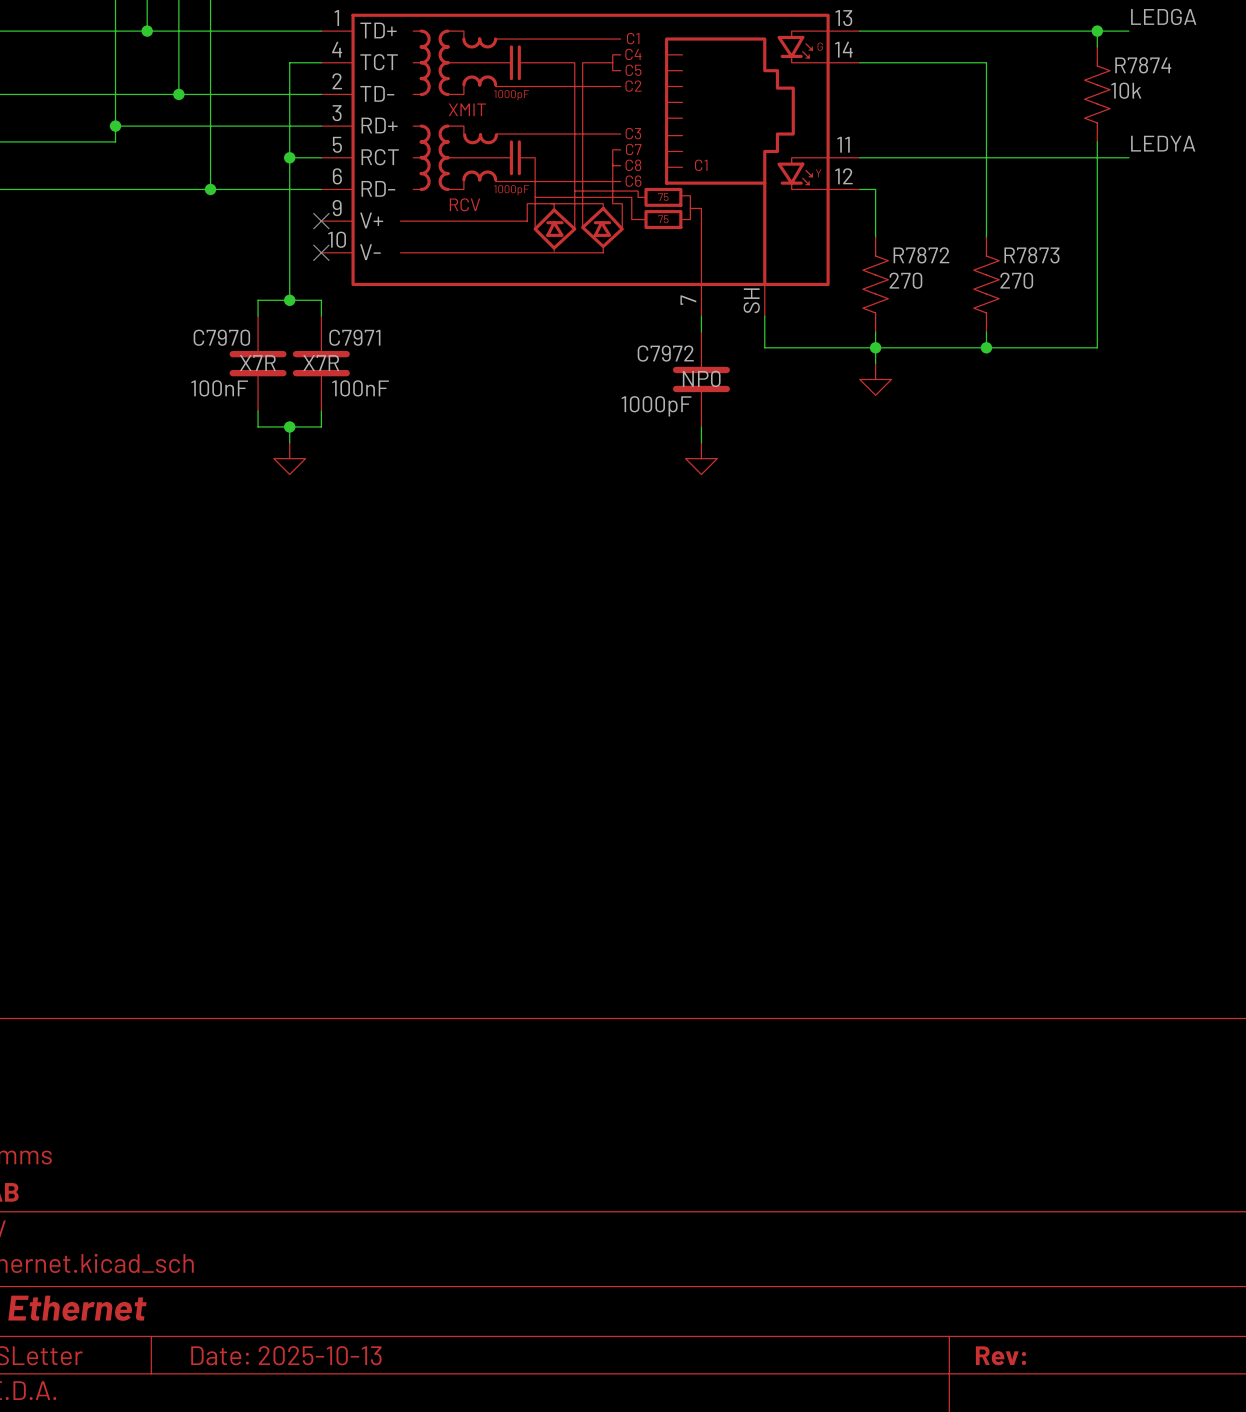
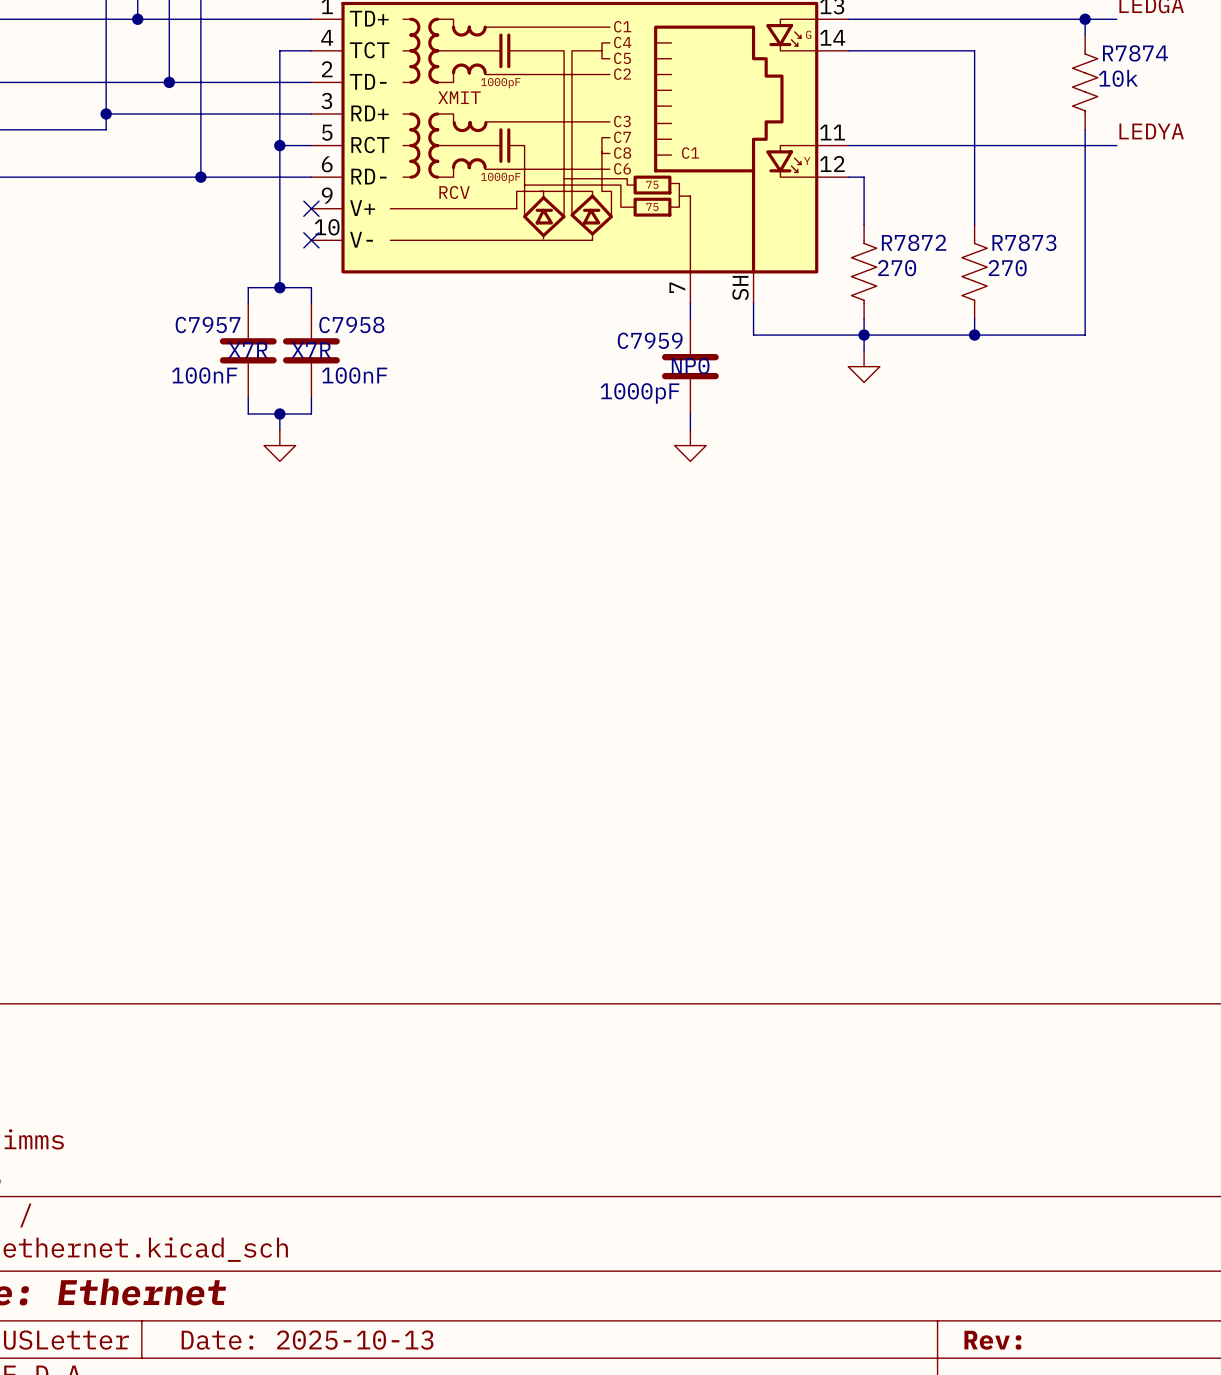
C7970 name: C7970 (221, 337) -> C7957 (208, 324)
C7971 name: C7971 (354, 337) -> C7958 (351, 324)
C7972 name: C7972 (665, 353) -> C7959 (650, 340)

